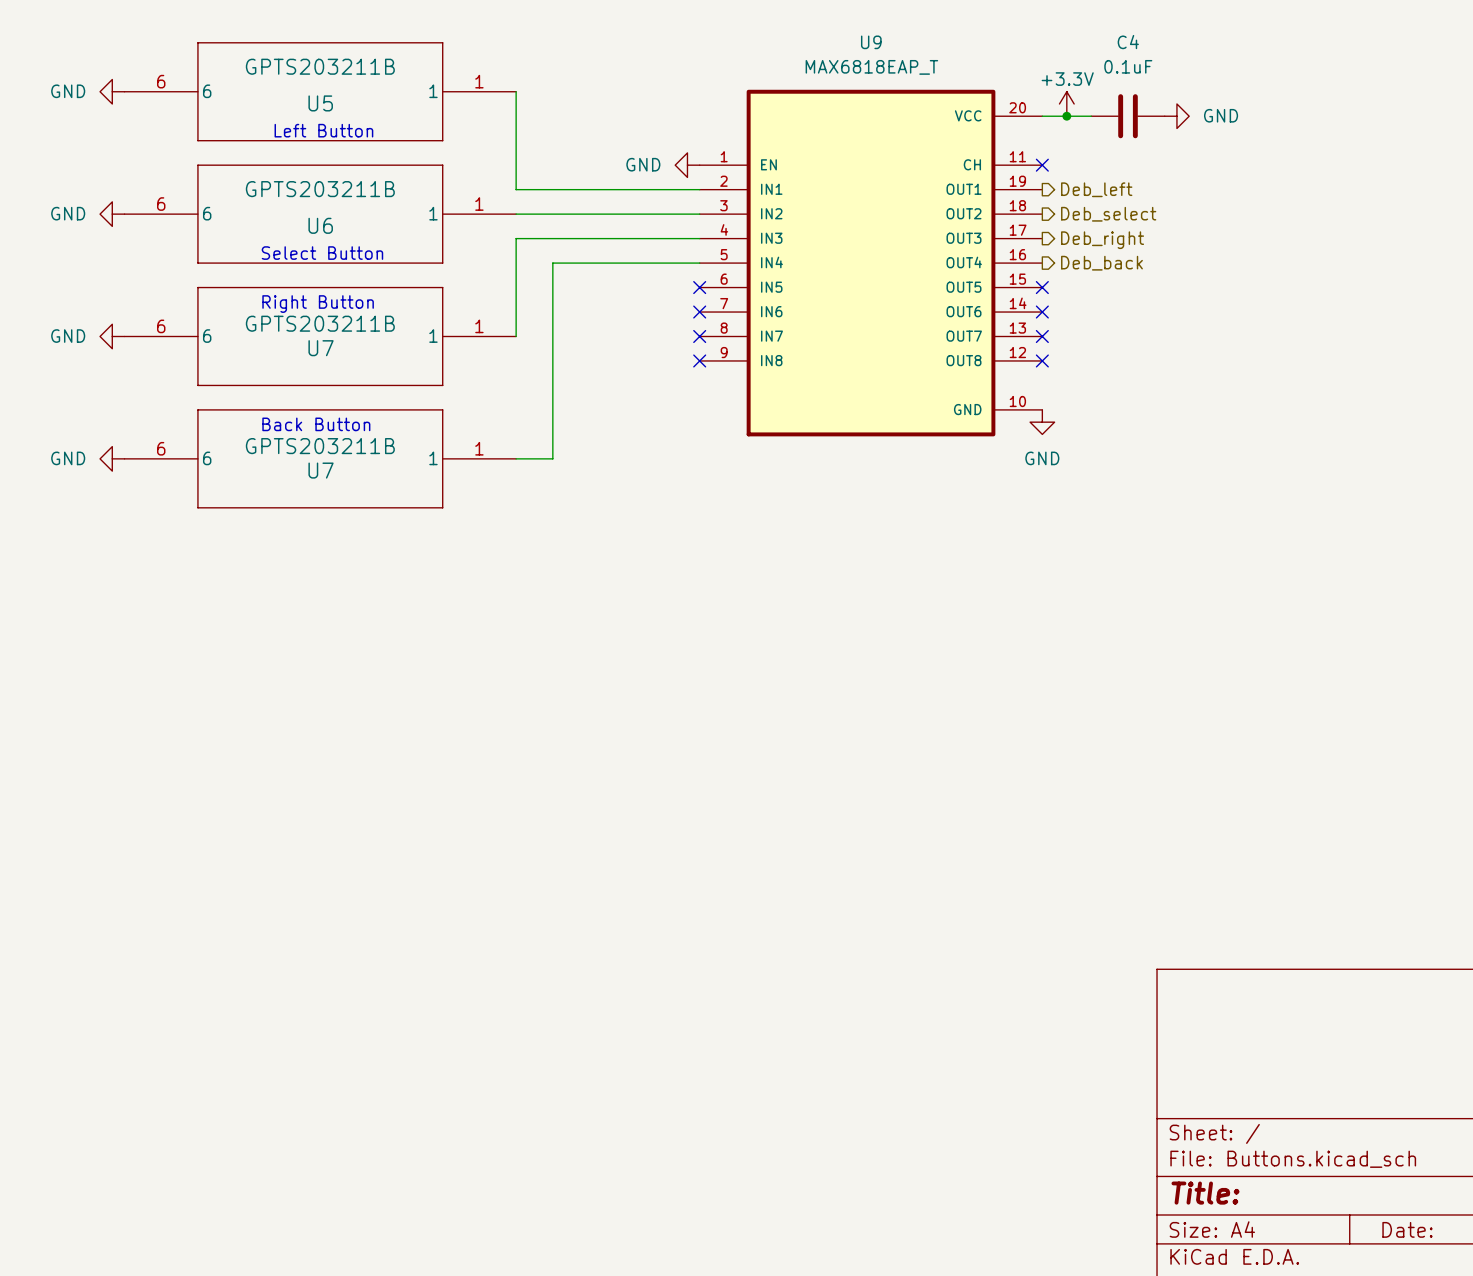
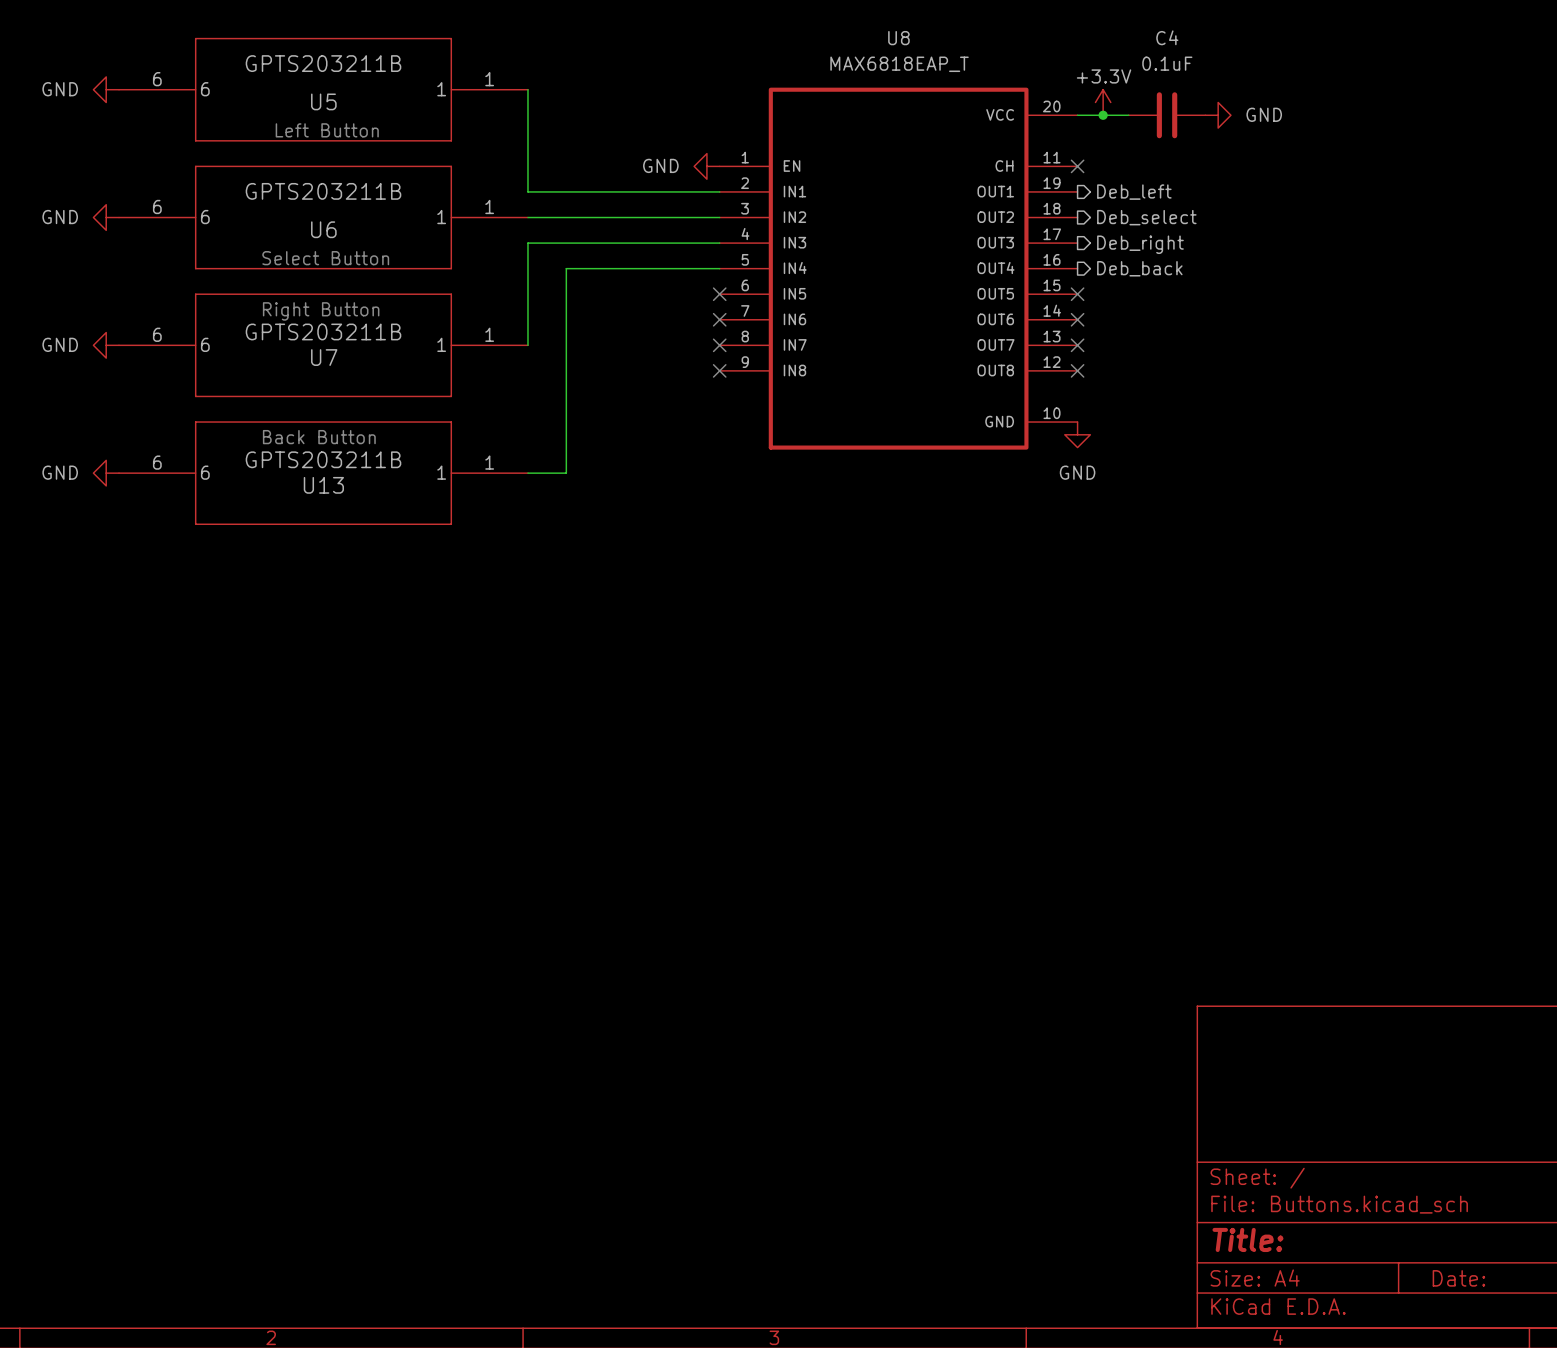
U9 name: U9 (871, 42) -> U8 (898, 38)
U7 name: U7 (321, 470) -> U13 (323, 485)

